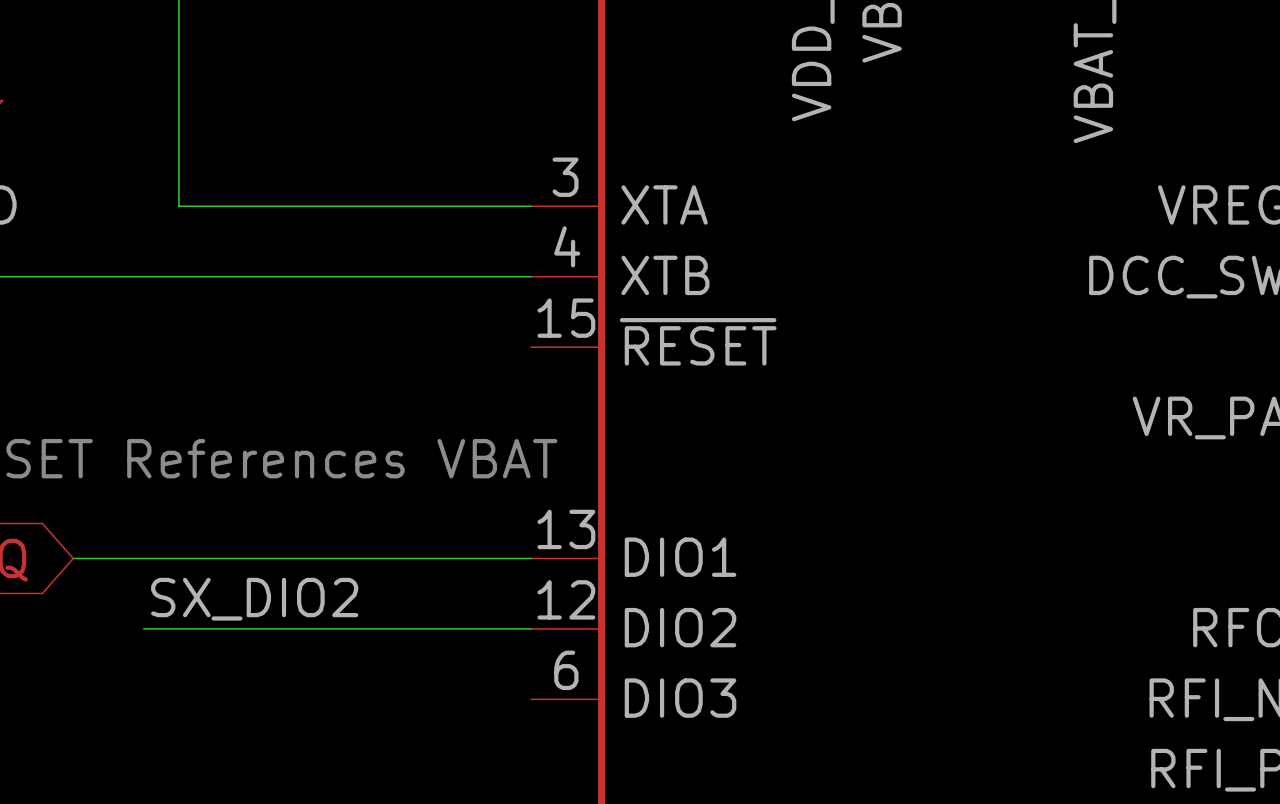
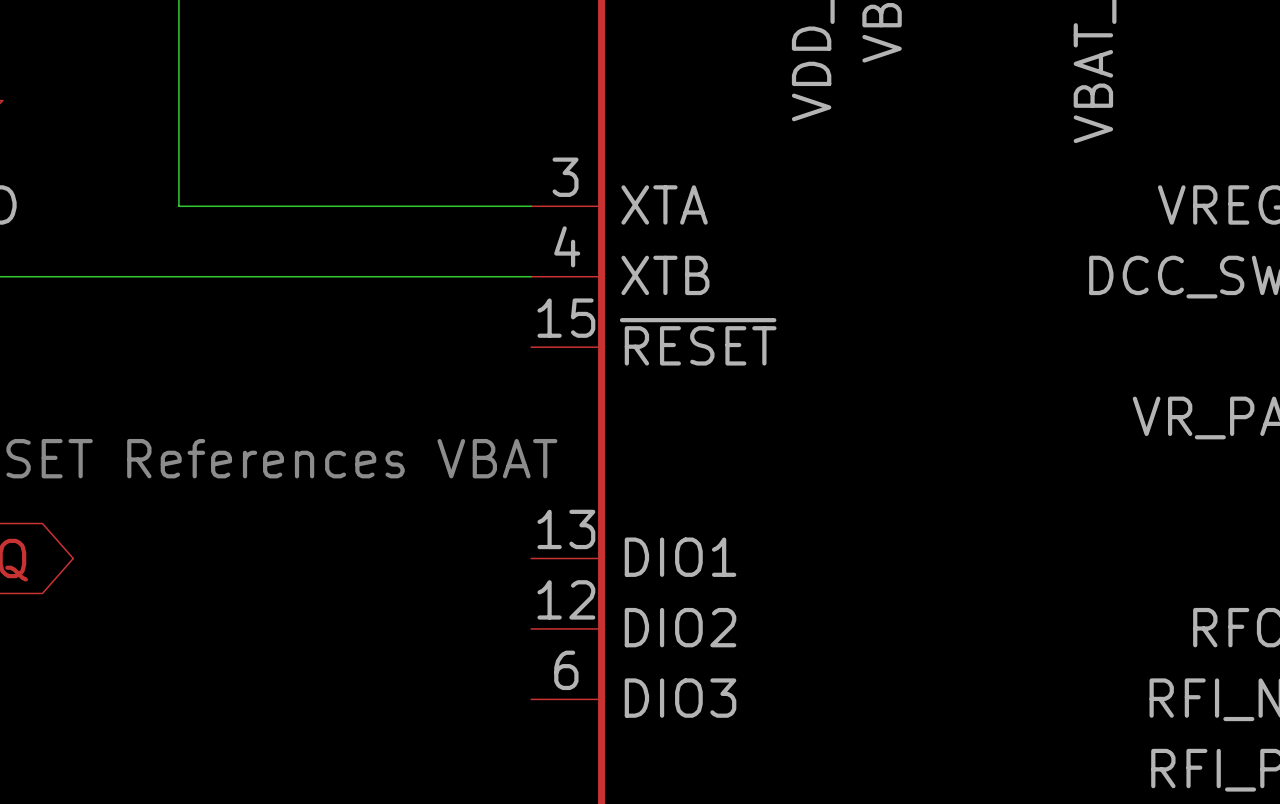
wire: (73, 558) (531, 558) -> none
label: SX_DIO2 (254, 599) -> none
wire: (143, 628) (531, 628) -> none

